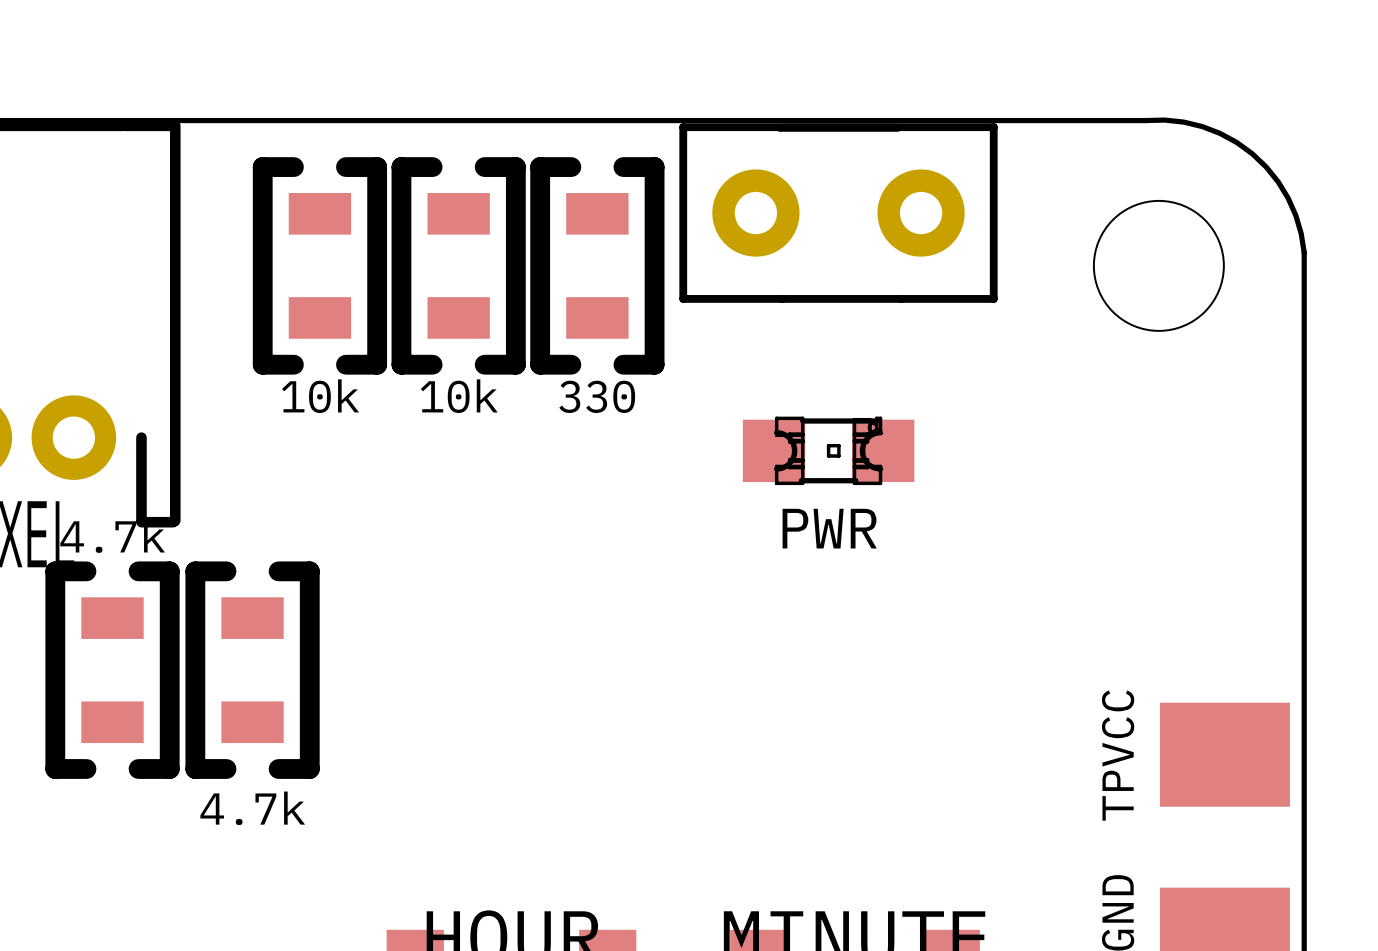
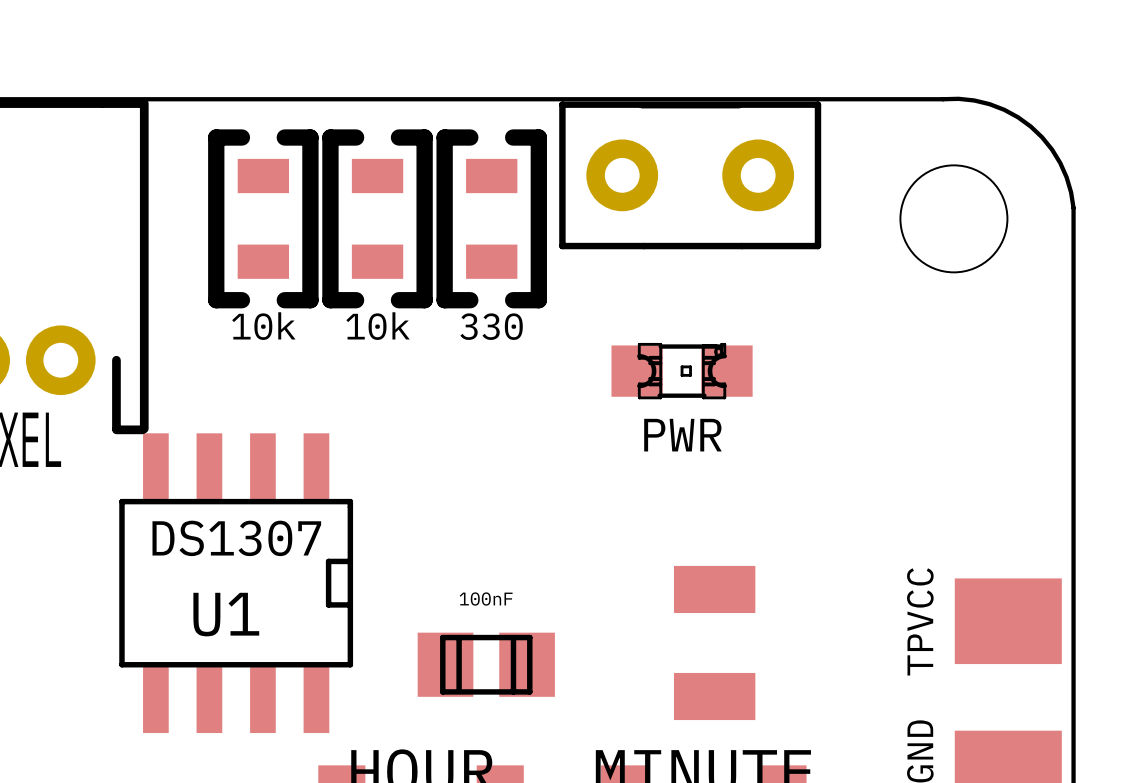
part: 4.7k (112, 670) -> none
part: 4.7k (252, 670) -> none
U1: none -> DS1307 (236, 583)
part: none -> (714, 642)
part: none -> 100nF (486, 664)

